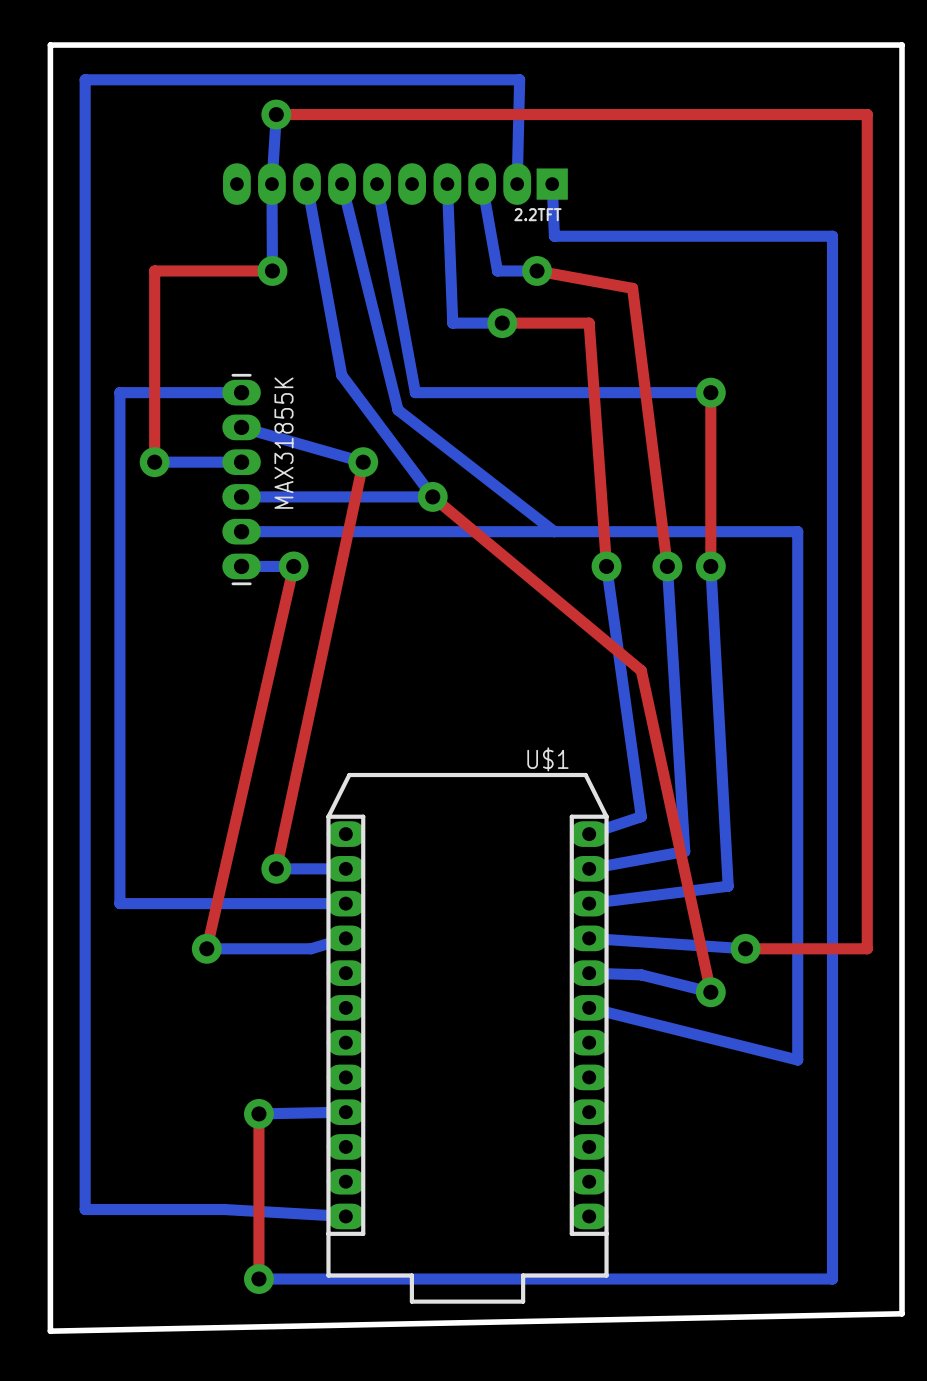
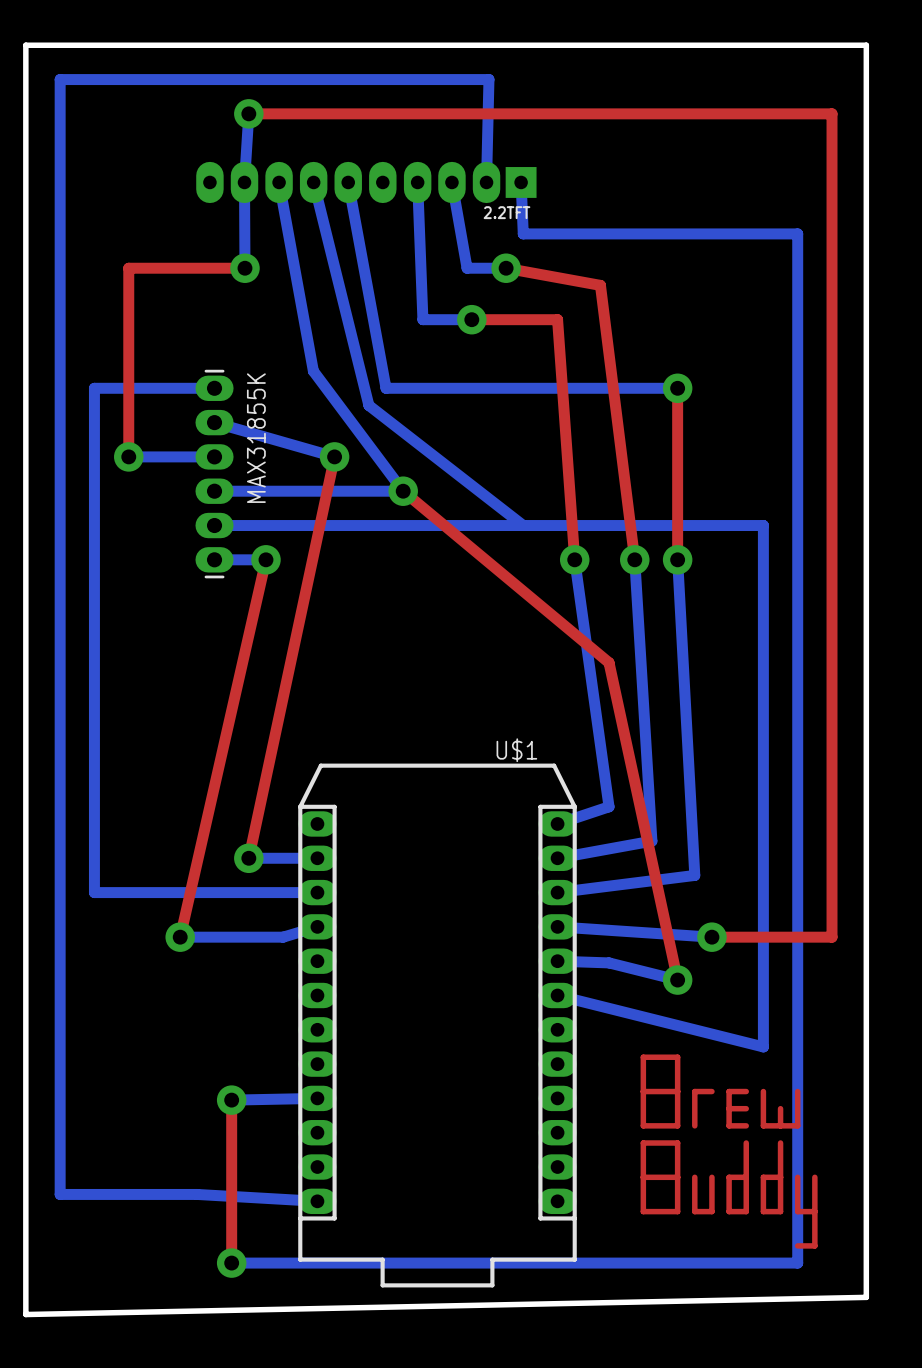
top track: none -> (643, 1057) (643, 1125) (677, 1125) (677, 1057) (643, 1057)
top track: none -> (643, 1091) (677, 1091)
top track: none -> (711, 1091) (694, 1091) (694, 1125)
top track: none -> (746, 1091) (729, 1091) (729, 1125) (746, 1125)
top track: none -> (763, 1091) (763, 1125) (797, 1125) (797, 1091)
top track: none -> (729, 1108) (746, 1108)
top track: none -> (780, 1108) (780, 1125)
top track: none -> (643, 1143) (643, 1211) (677, 1211) (677, 1143) (643, 1143)
top track: none -> (746, 1143) (746, 1211) (729, 1211) (729, 1177) (746, 1177)
top track: none -> (780, 1143) (780, 1211) (763, 1211) (763, 1177) (780, 1177)
top track: none -> (643, 1177) (677, 1177)
top track: none -> (694, 1177) (694, 1211) (711, 1211) (711, 1177)
top track: none -> (797, 1177) (797, 1211) (814, 1211)
top track: none -> (814, 1177) (814, 1245) (797, 1245)

